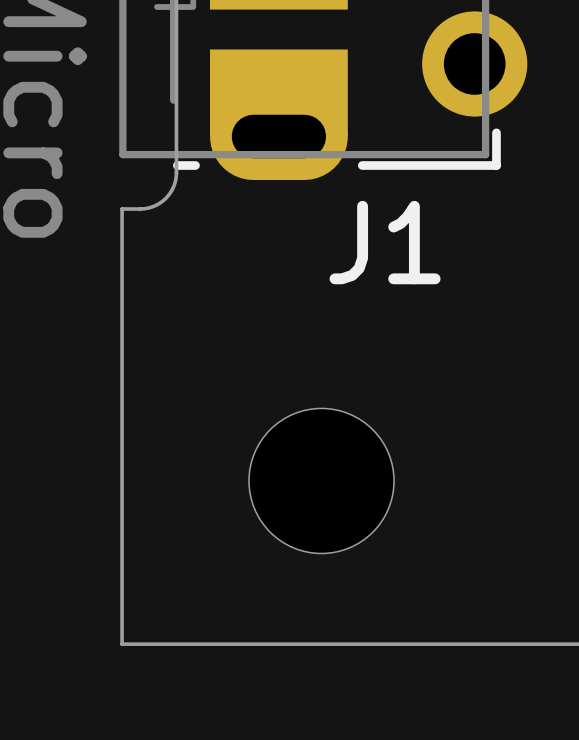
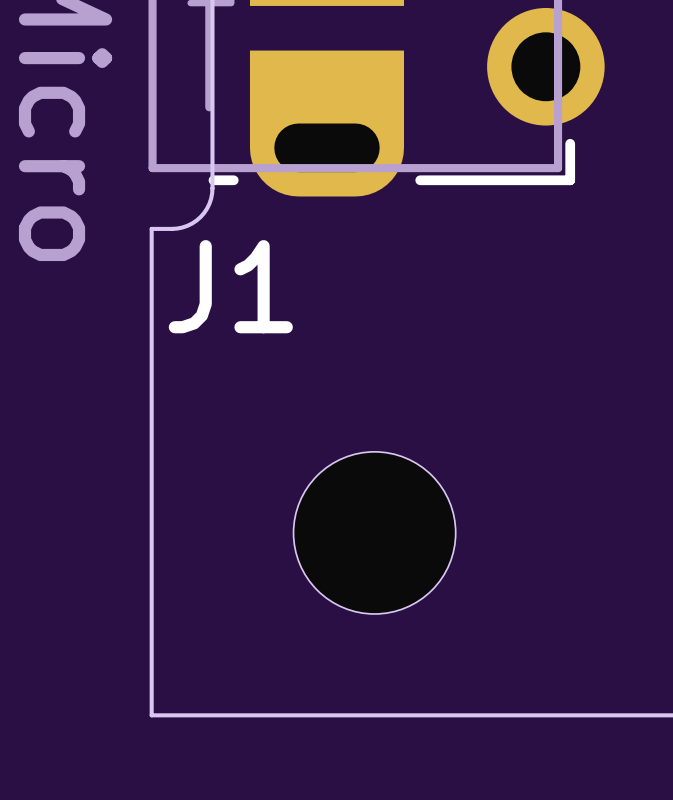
J1 name position: J1 (385, 242) -> J1 (230, 286)

